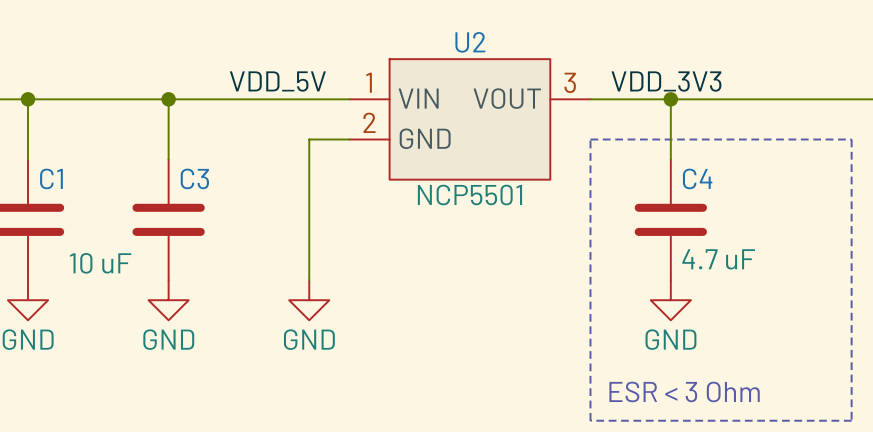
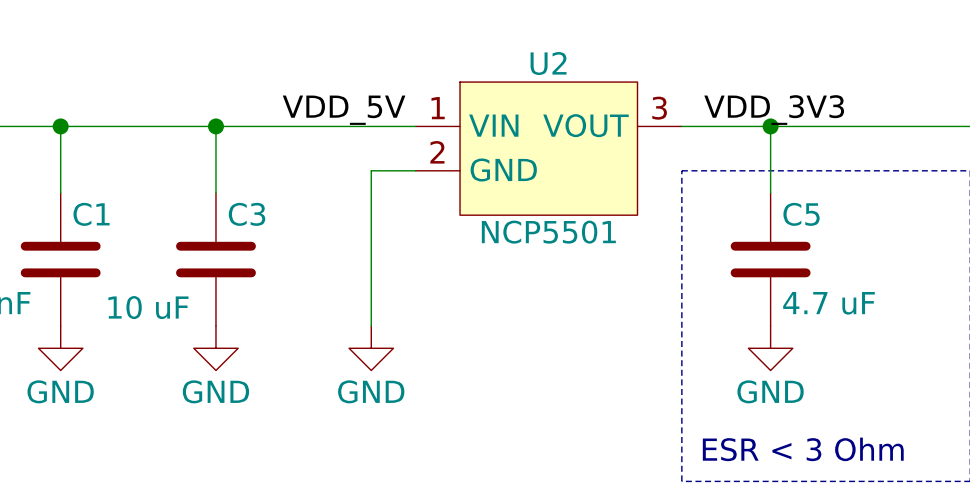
C4 name: C4 (697, 178) -> C5 (801, 214)

